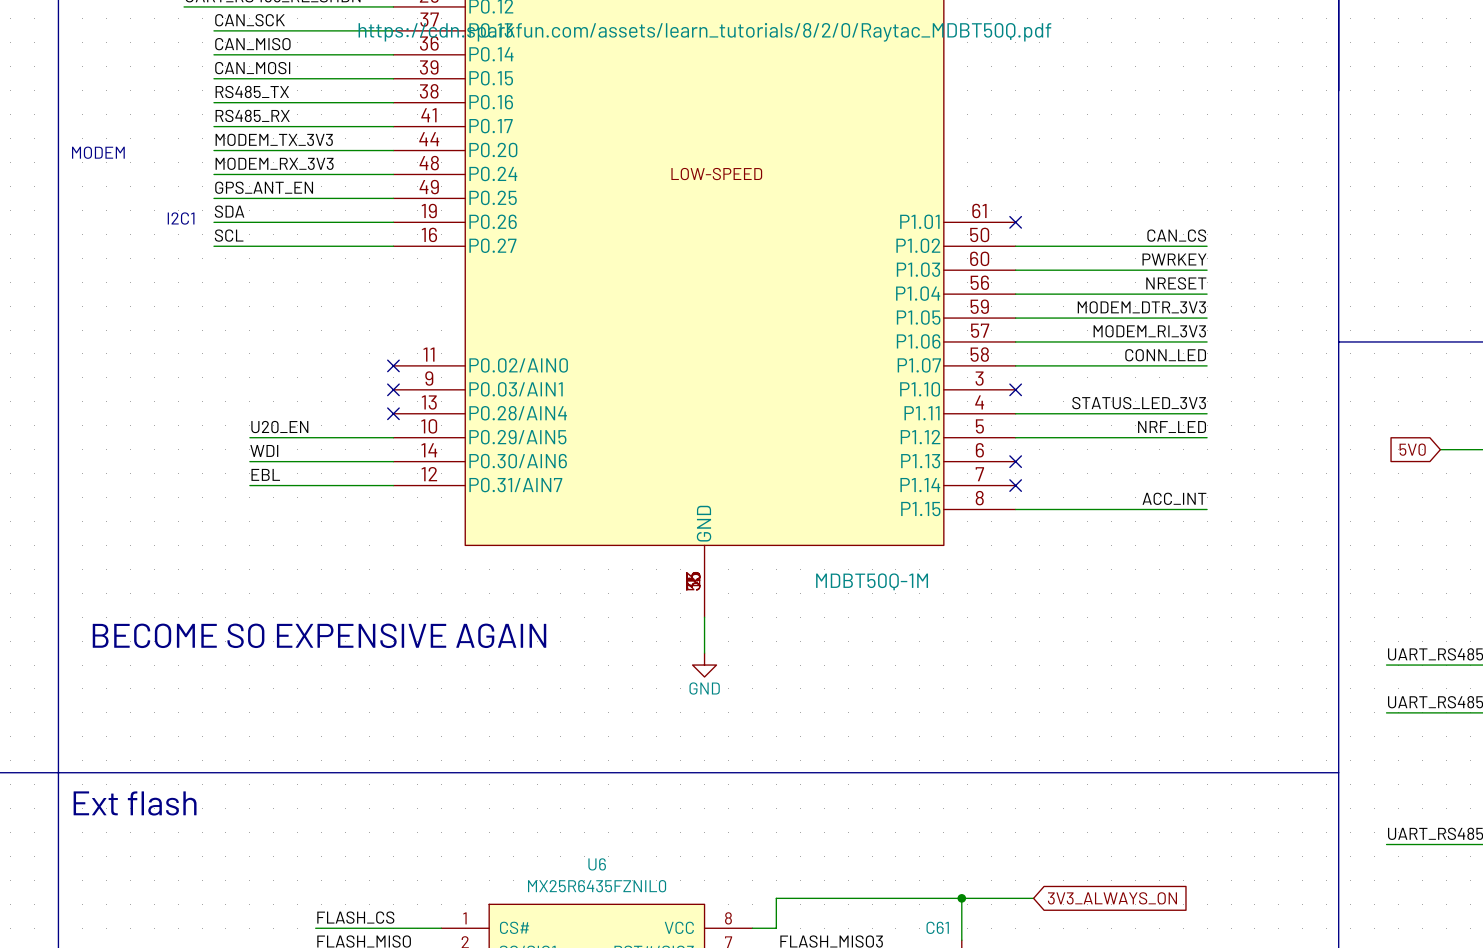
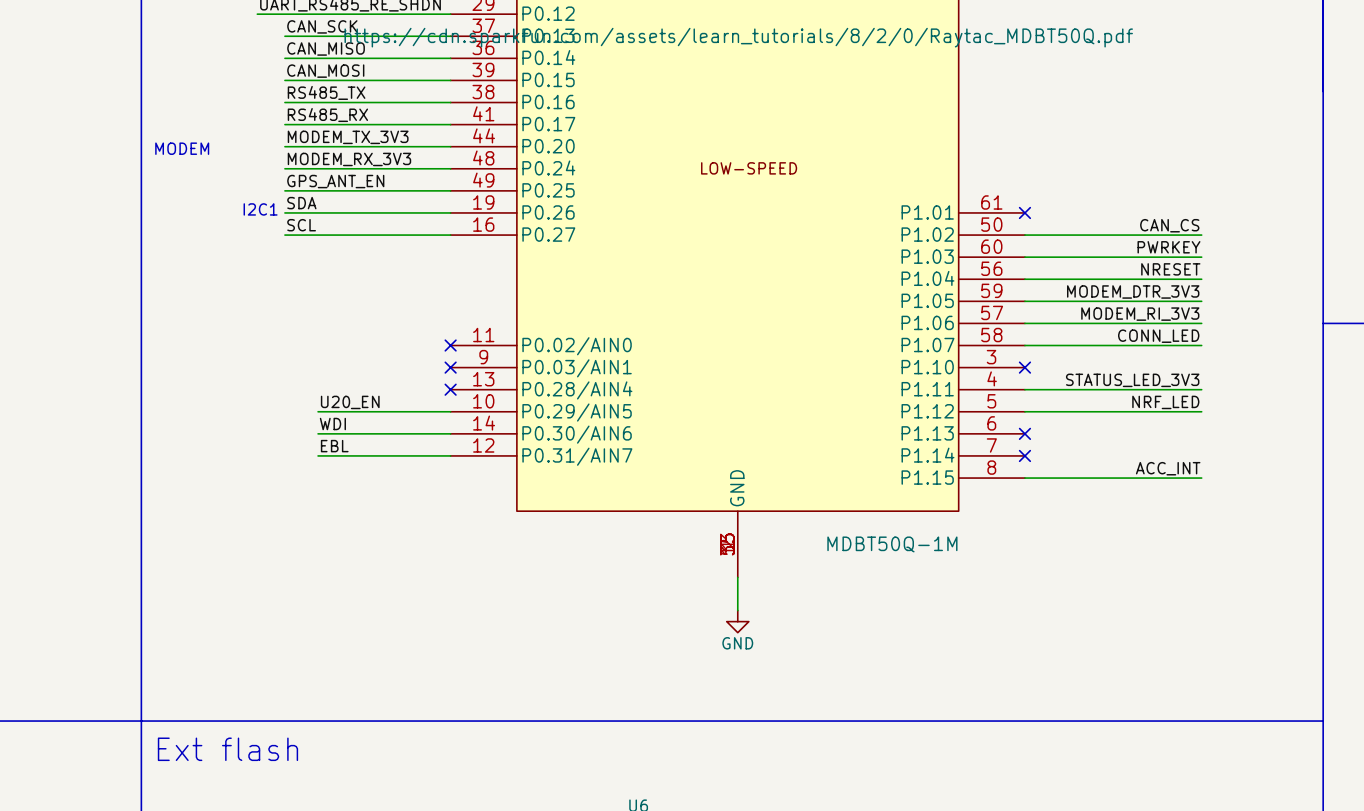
text: BECOME SO EXPENSIVE AGAIN (319, 635) -> none

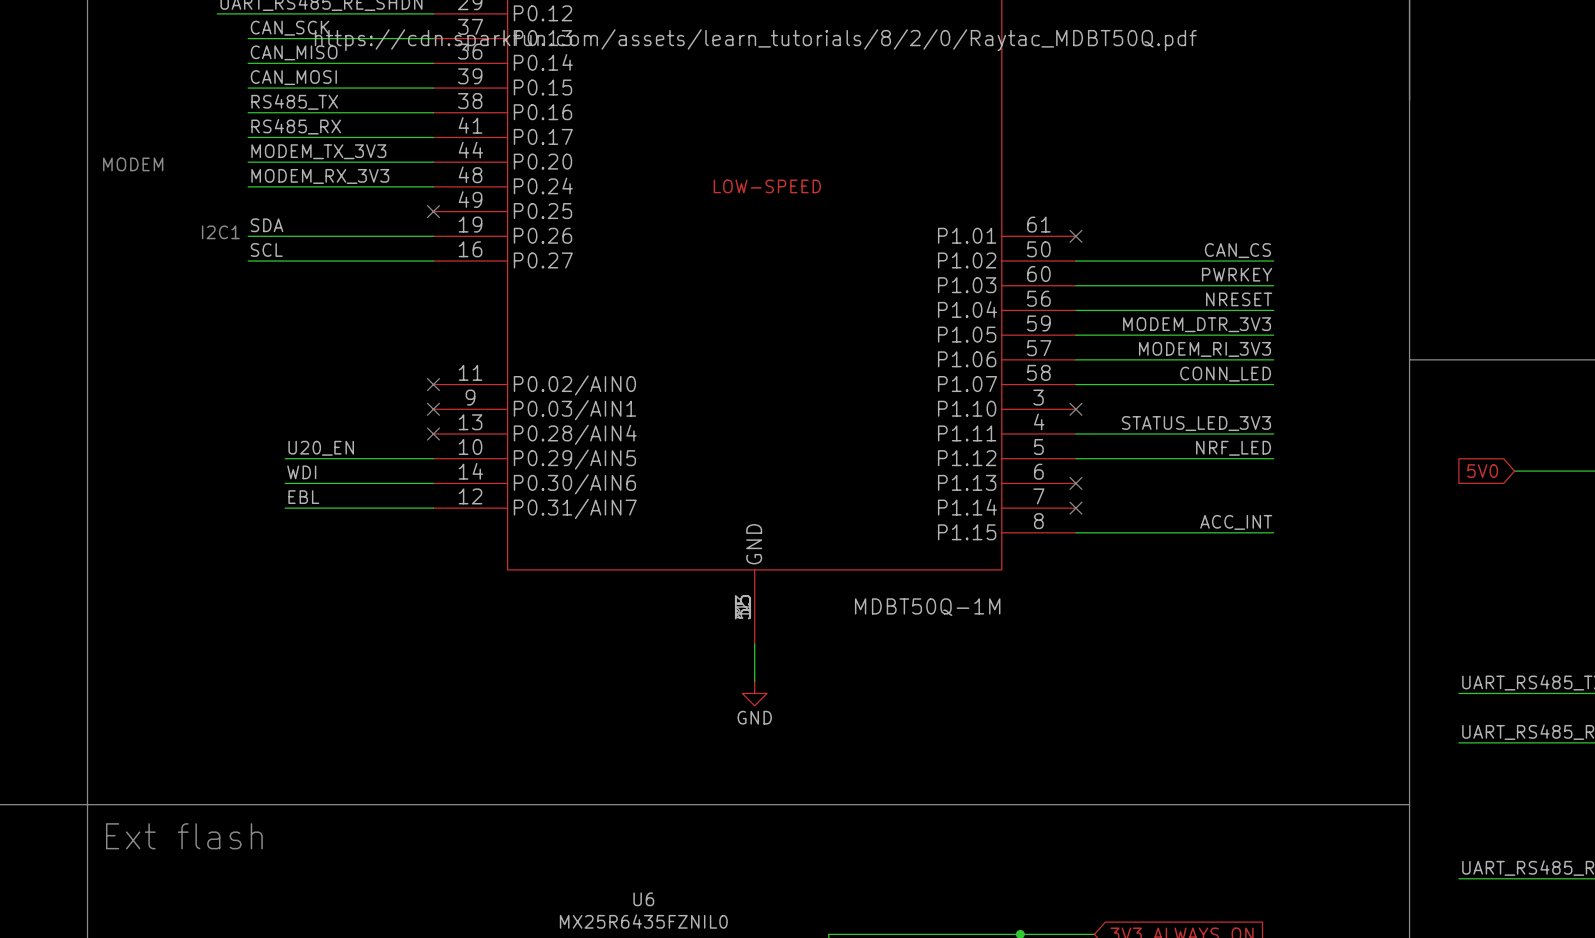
label: GPS_ANT_EN (335, 181) -> none
wire: (284, 190) (450, 190) -> none
no-connect mark: none -> (433, 211)

